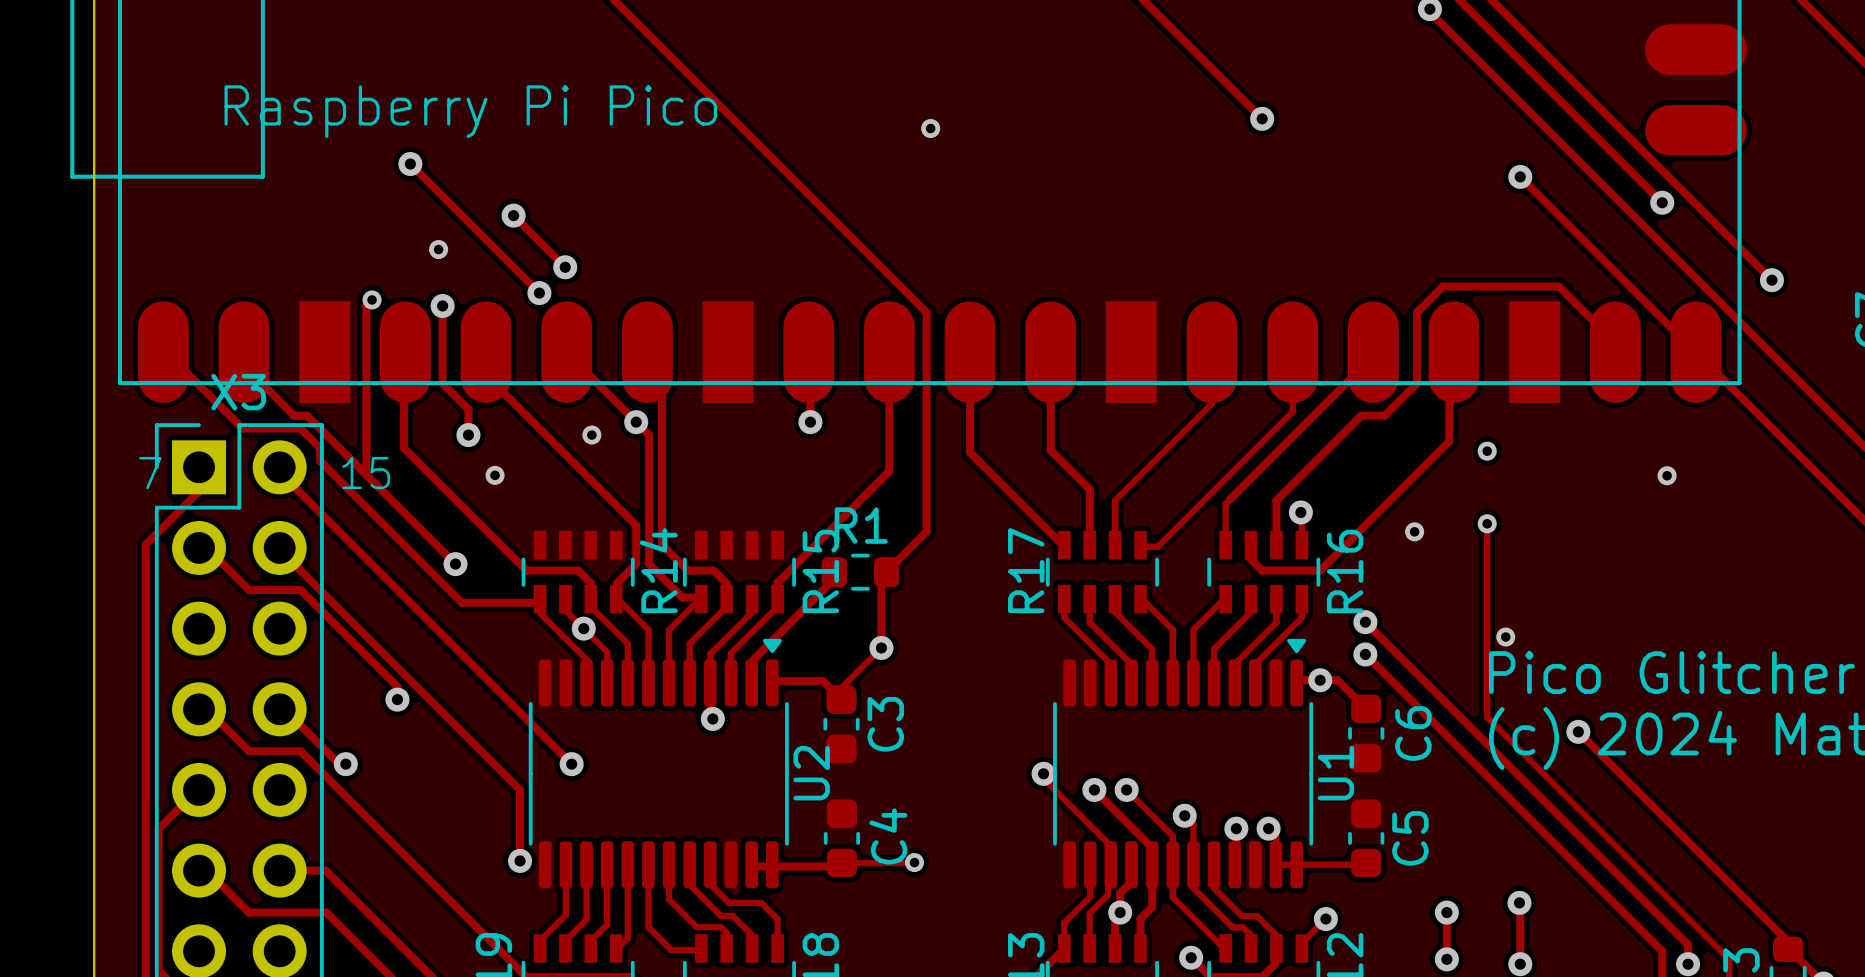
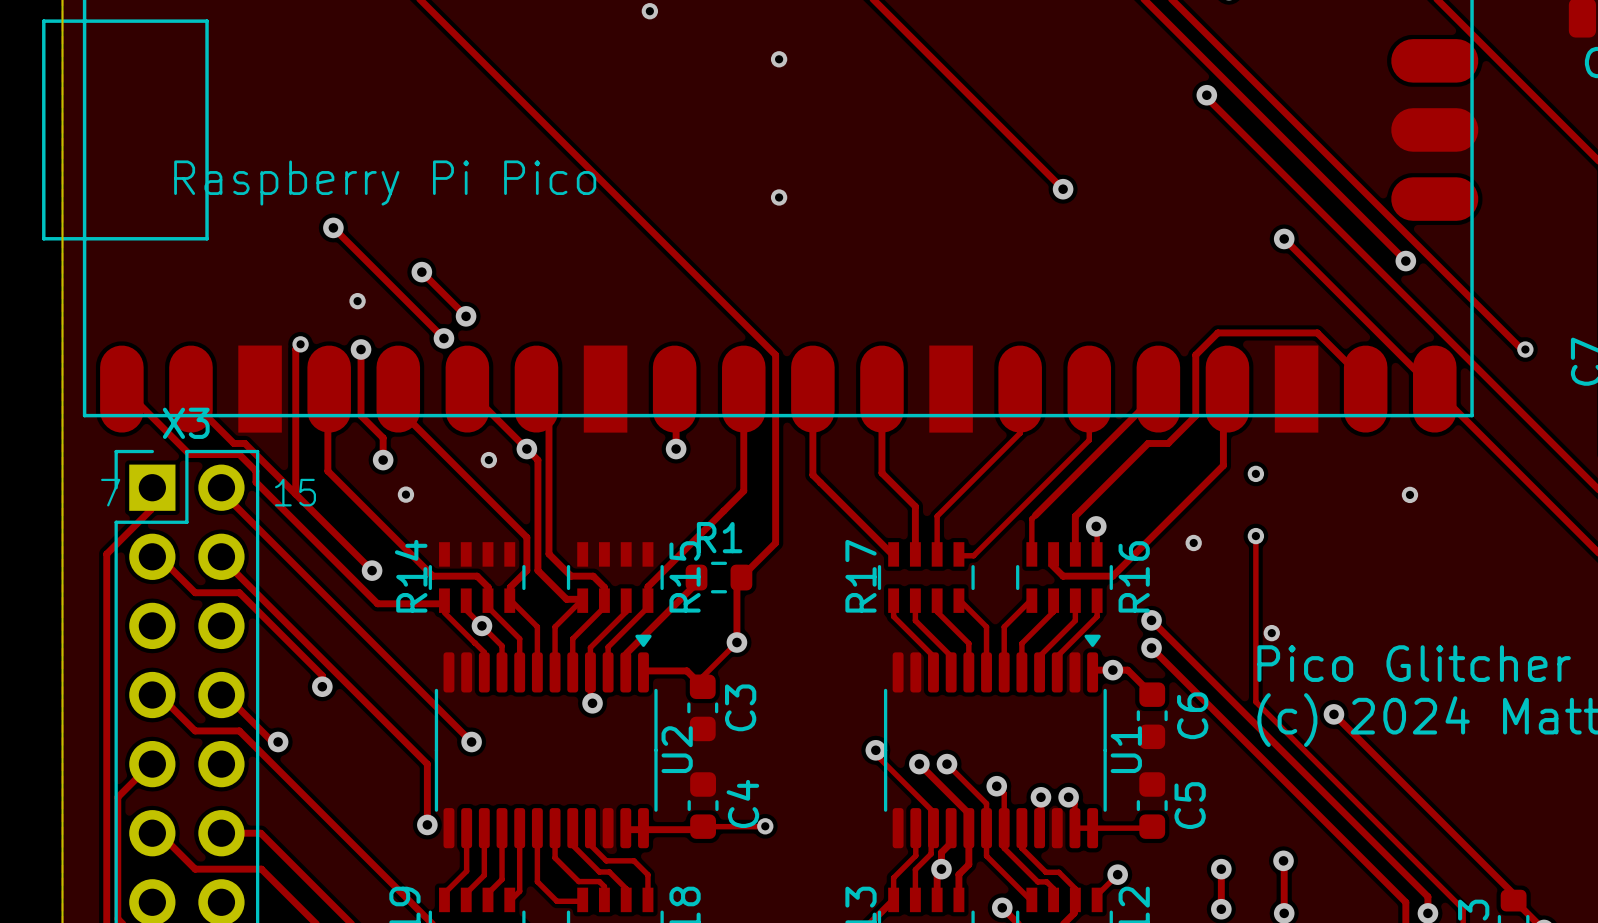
track: none -> (1499, 327) (1521, 349) (1525, 349)
via: (1771, 280) -> none
via: none -> (1525, 349)
R14 name position: R14 (658, 570) -> R14 (411, 576)

